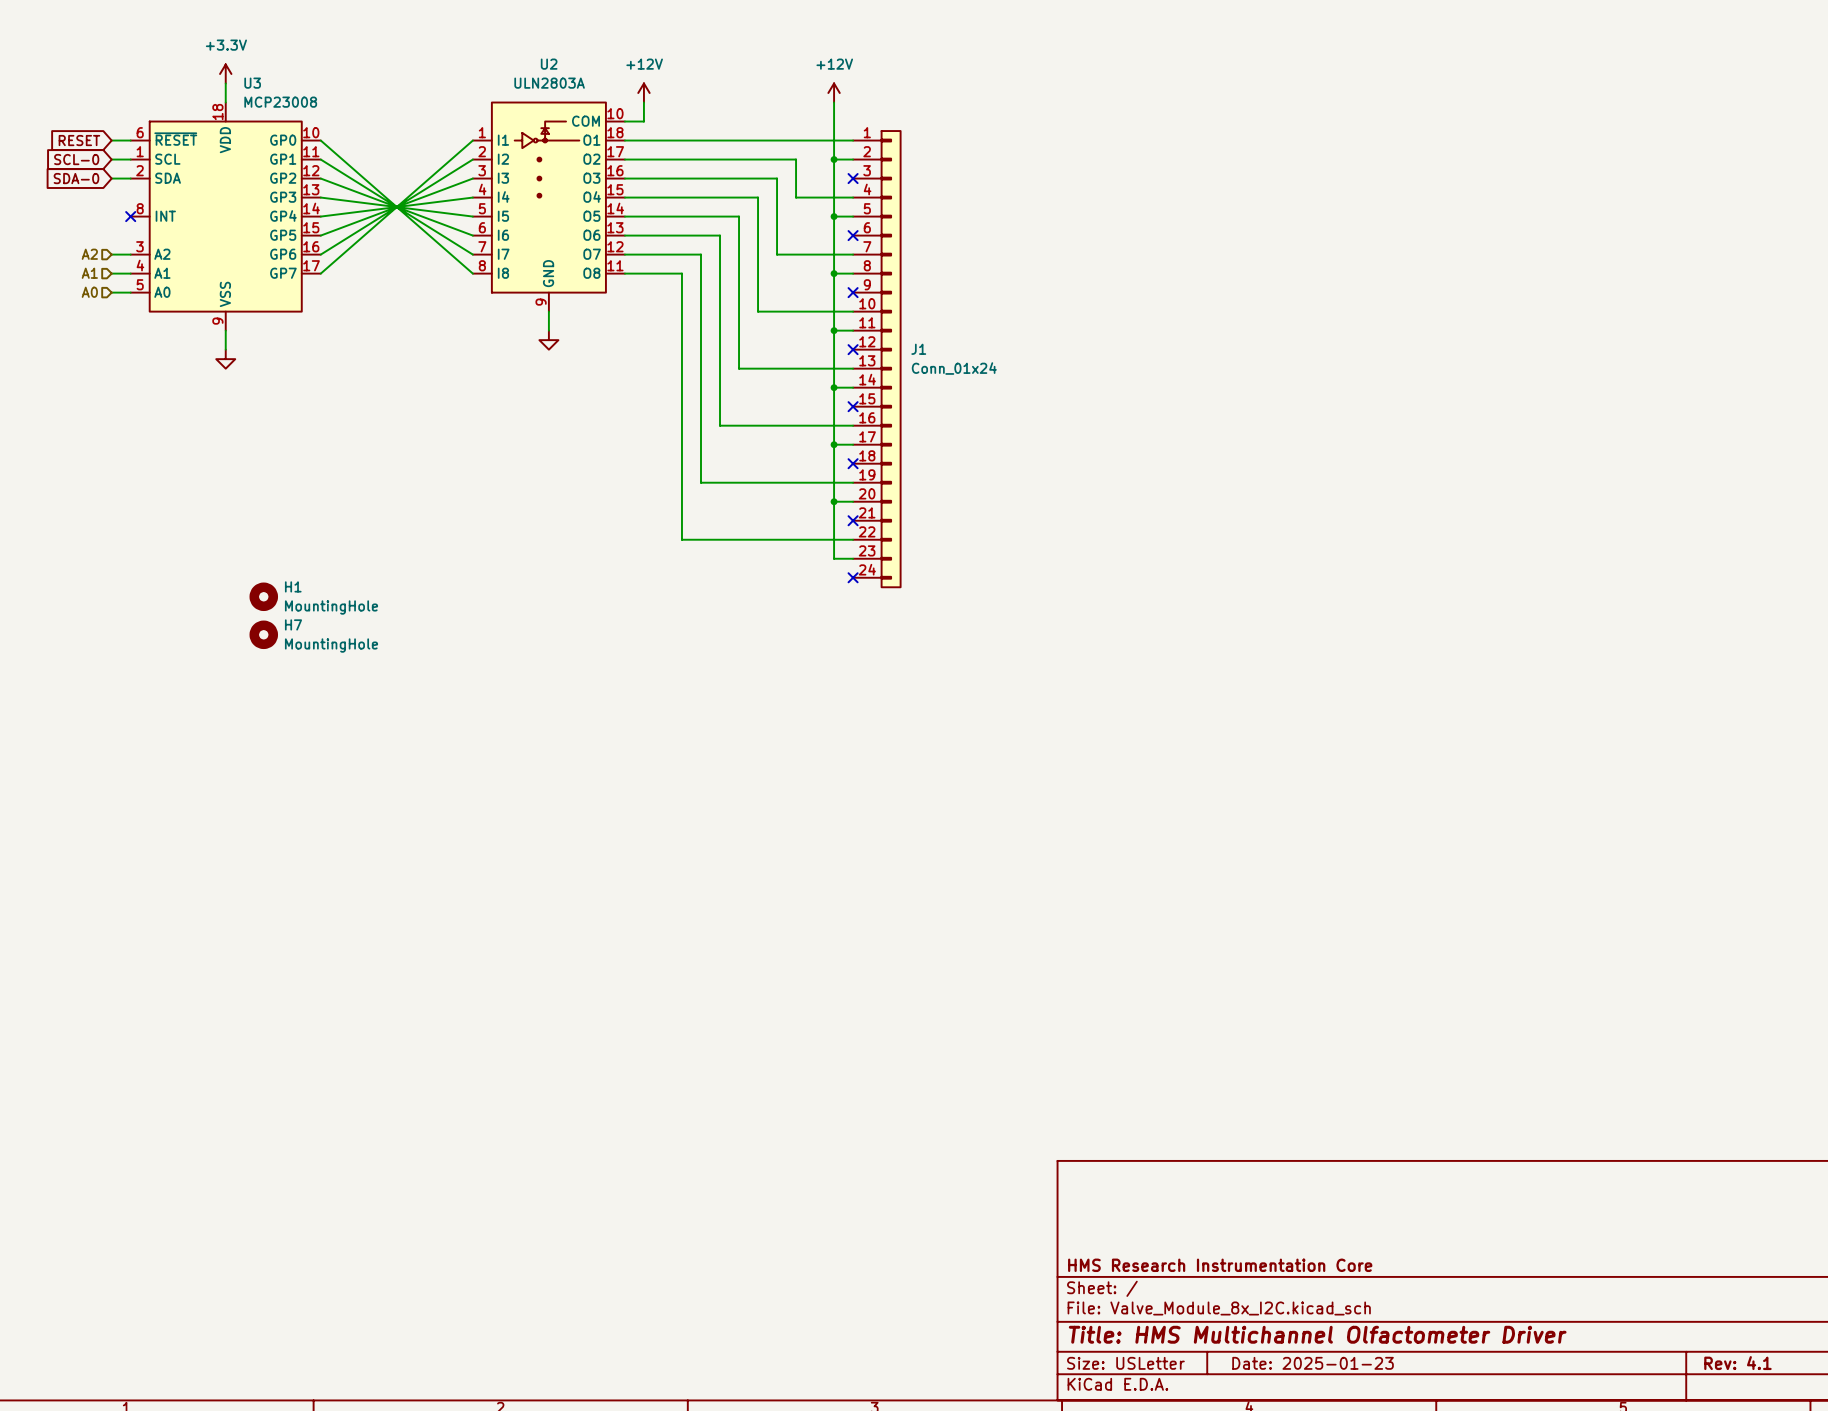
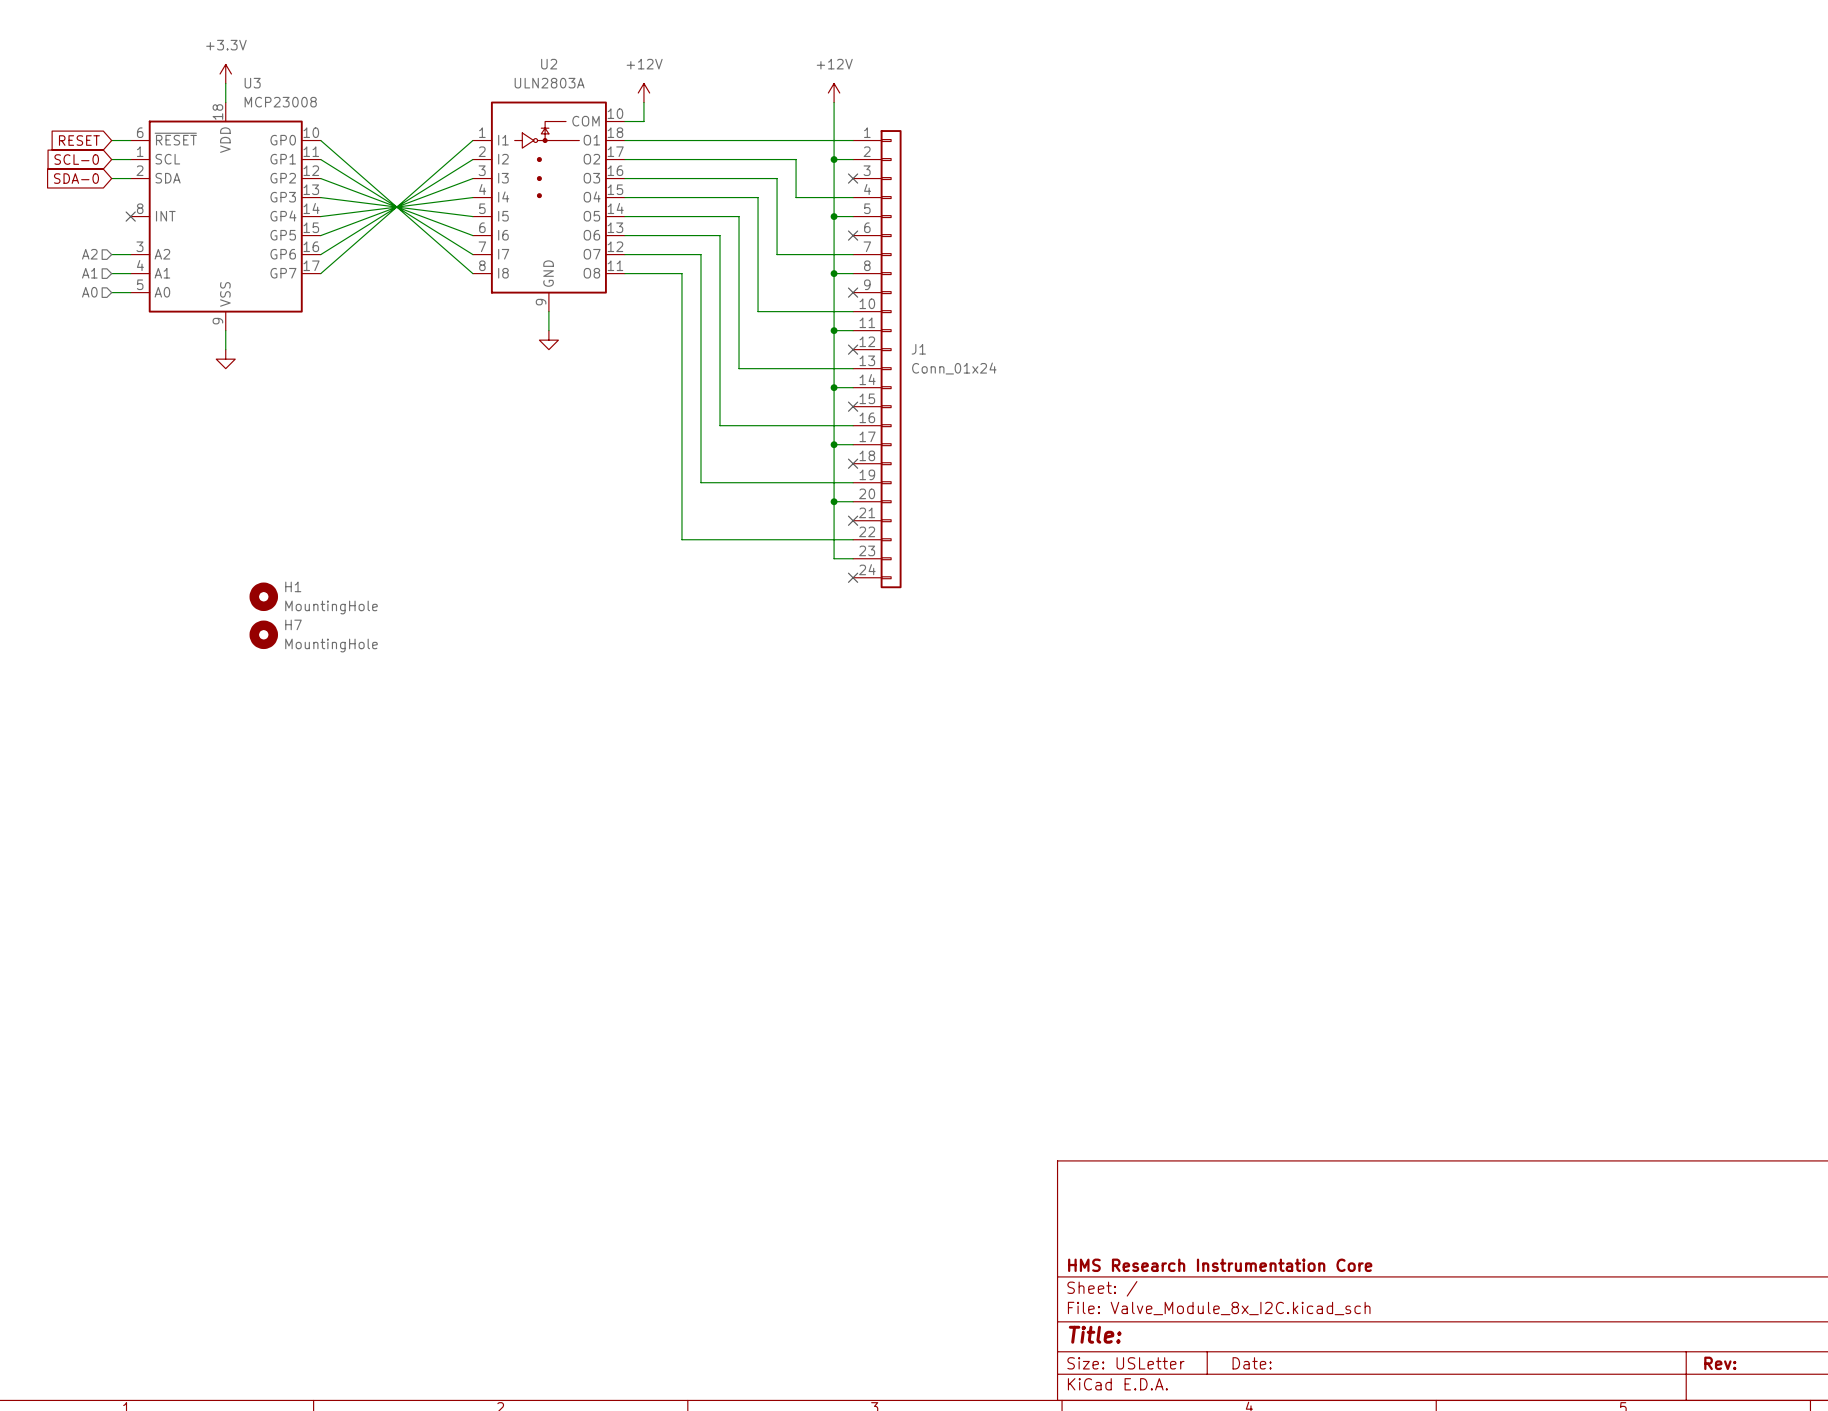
title block: Title: HMS Multichannel Olfactometer Driver (1317, 1334) -> Title: (1095, 1334)
title block: Date: 2025-01-23 (1313, 1363) -> Date: (1252, 1363)
title block: Rev: 4.1 (1737, 1363) -> Rev: (1720, 1363)

